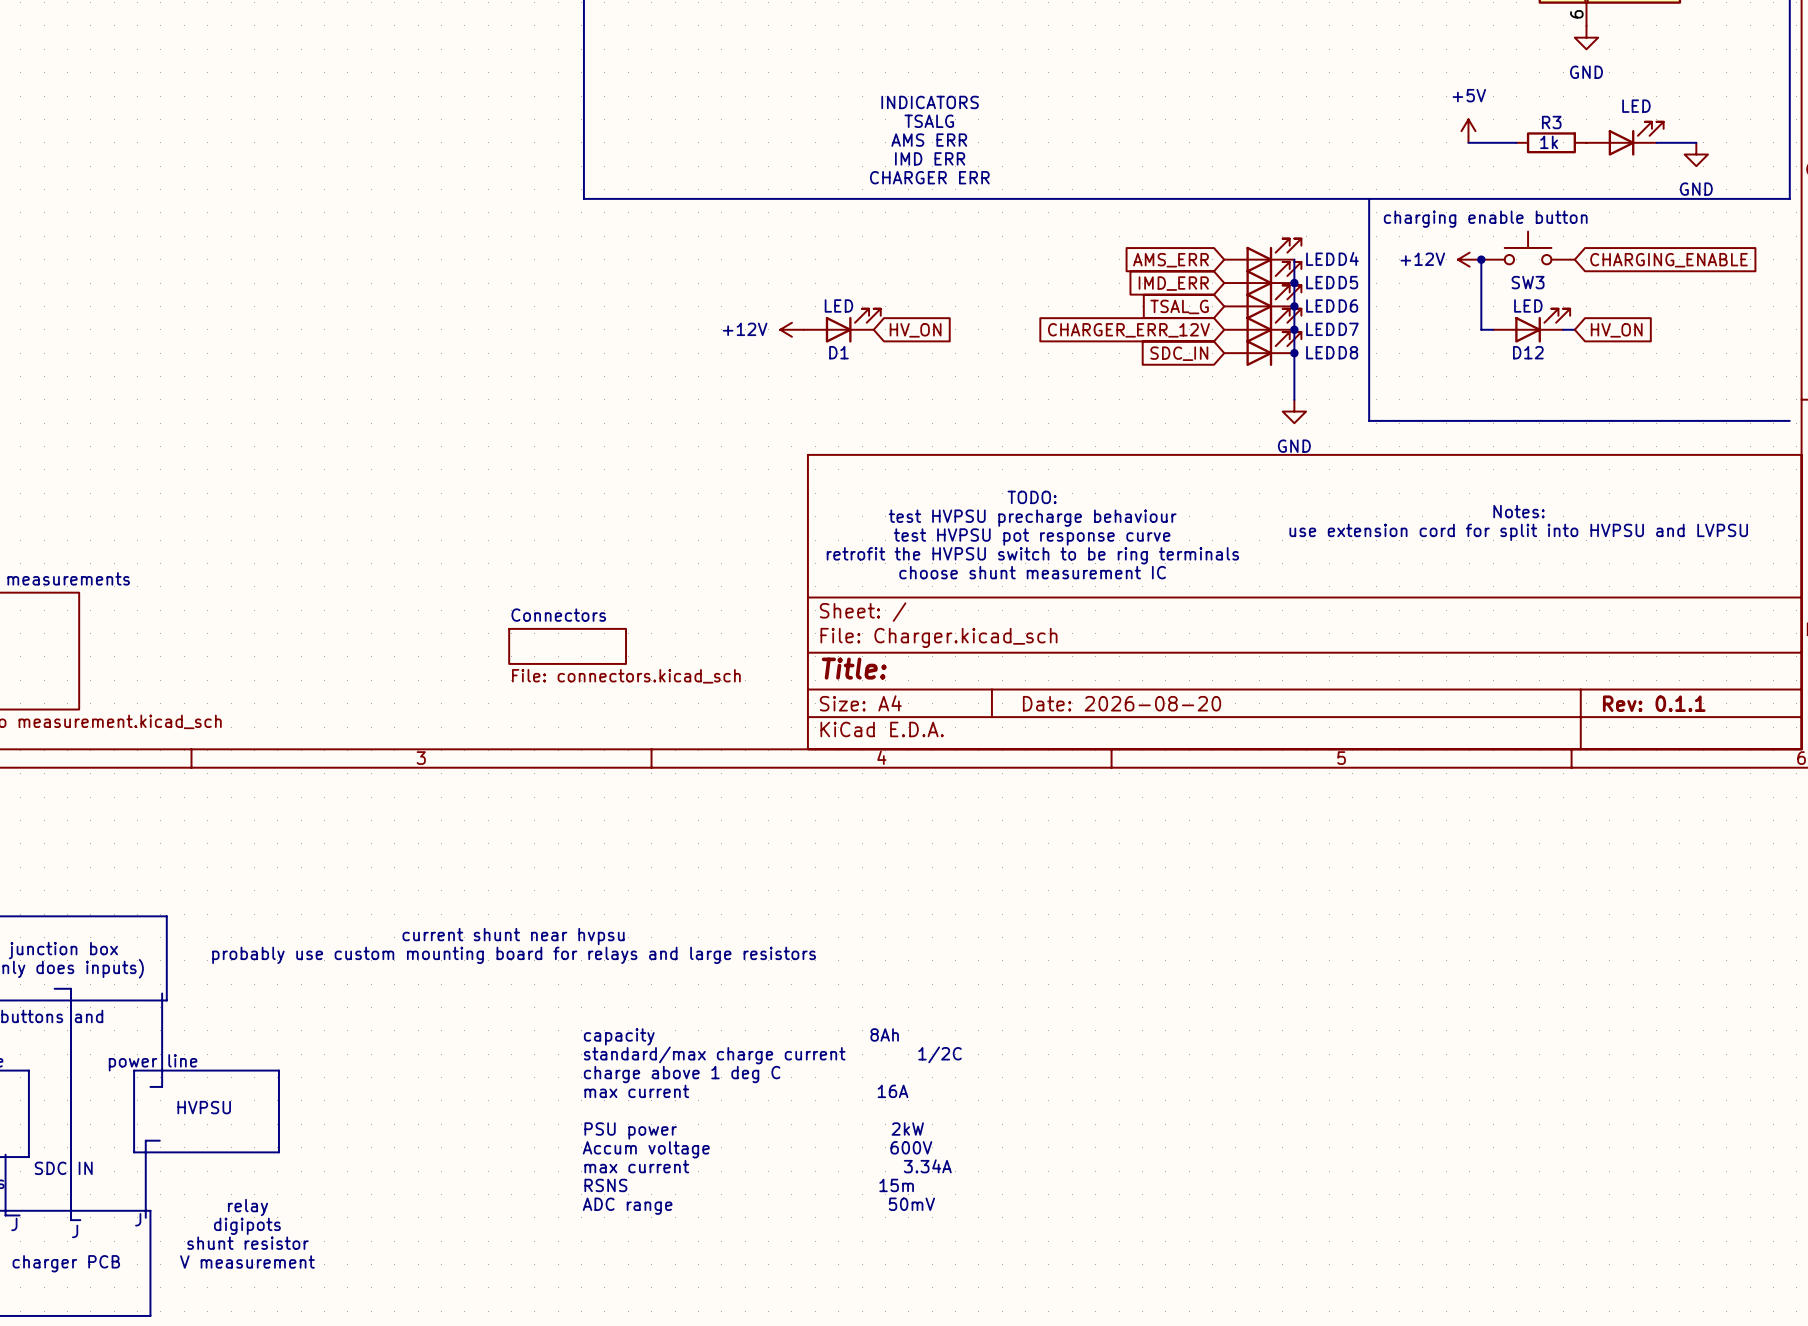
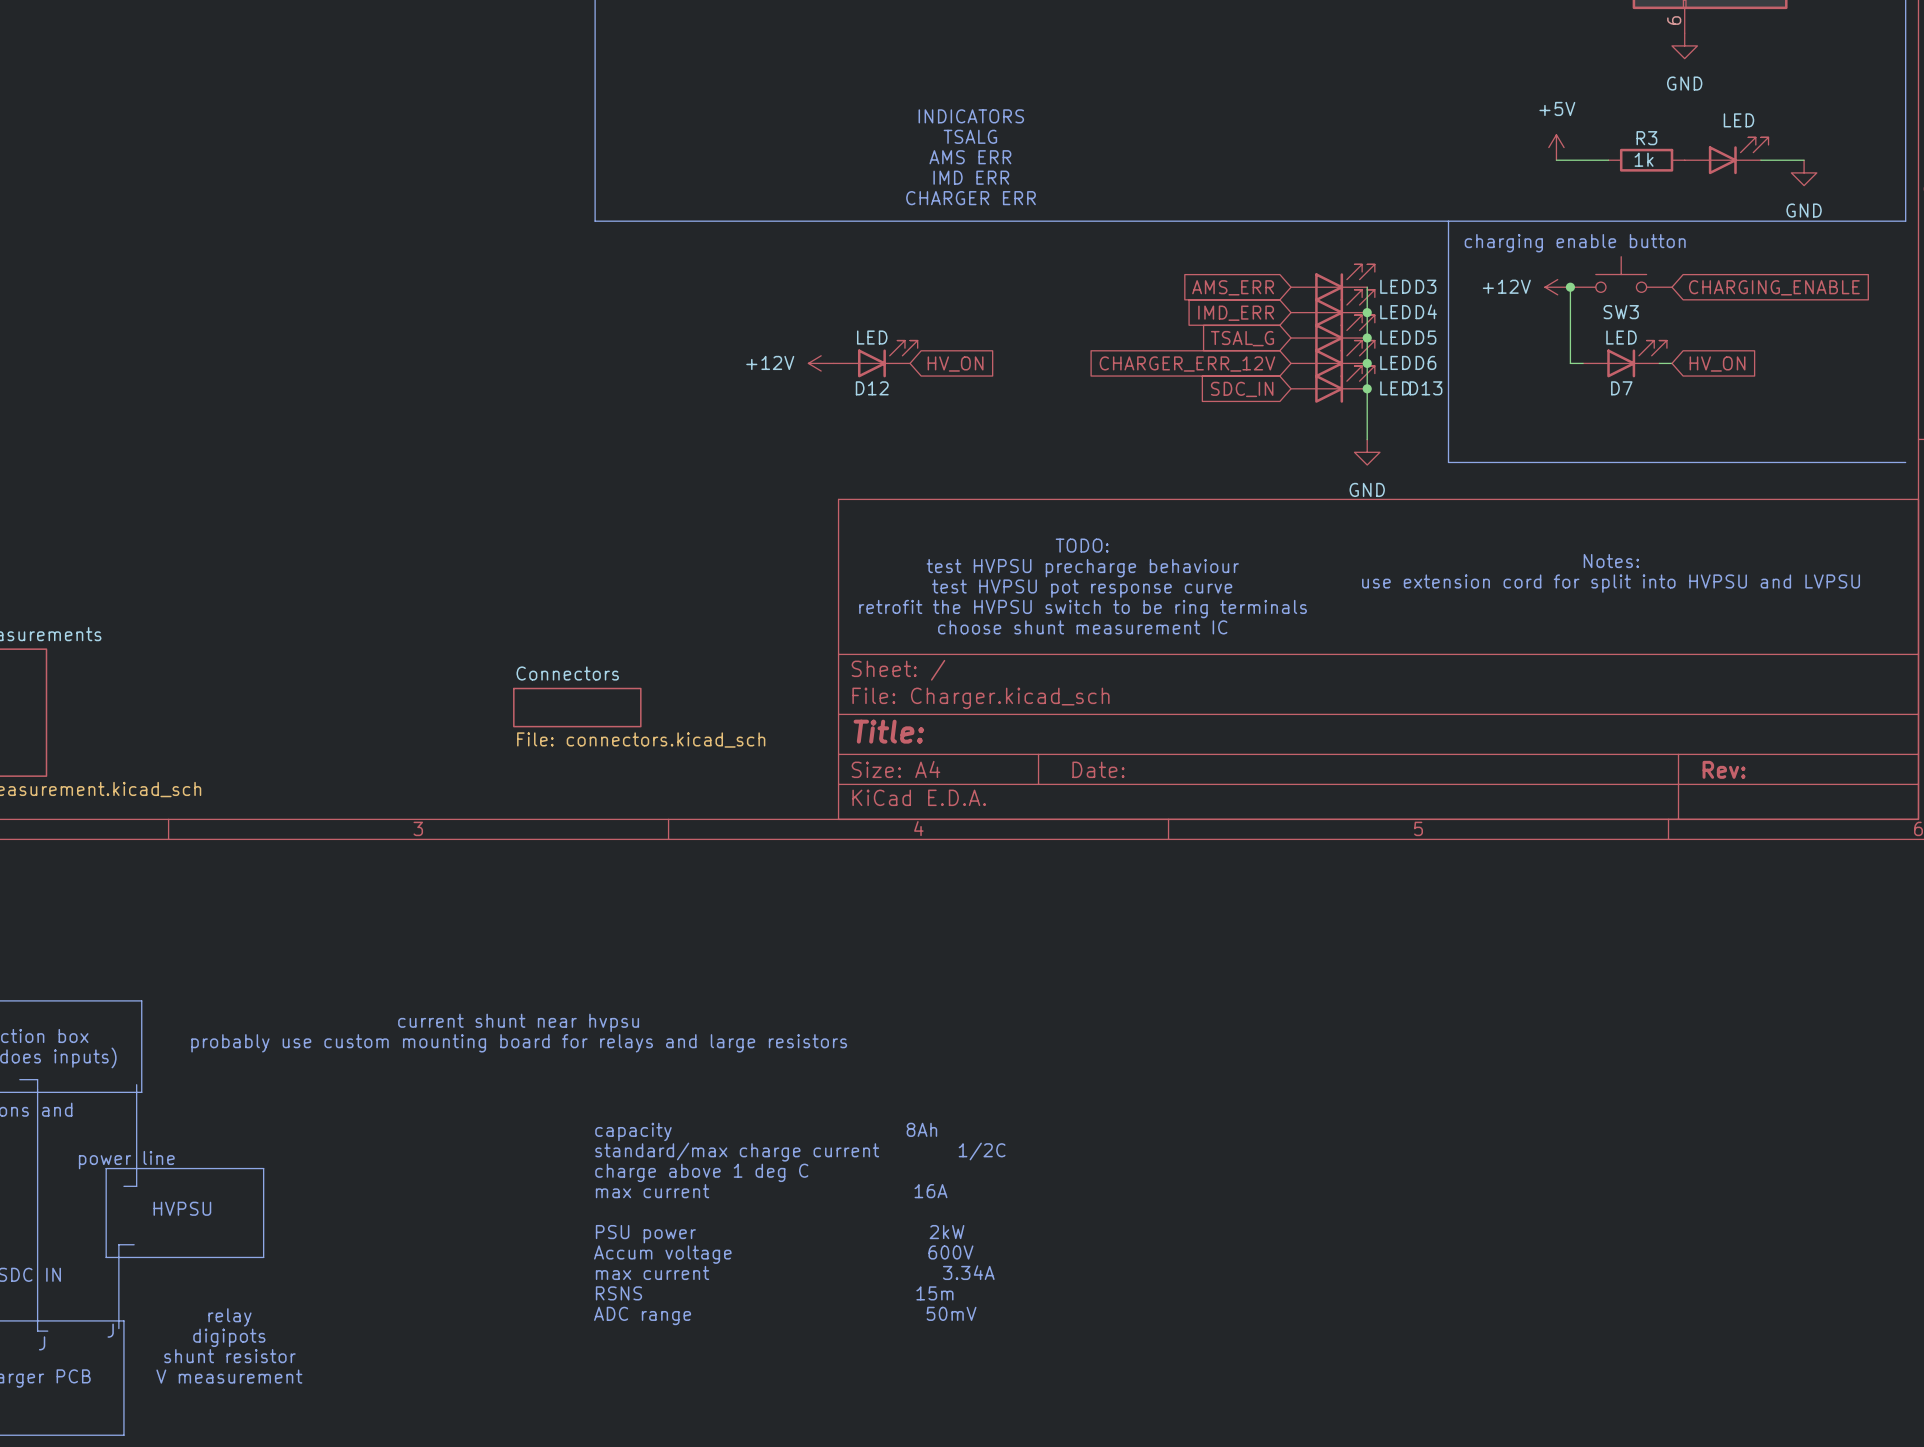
D4 name: D4 (1348, 258) -> D3 (1425, 286)
D5 name: D5 (1348, 282) -> D4 (1426, 311)
D6 name: D6 (1348, 305) -> D5 (1425, 337)
D7 name: D7 (1348, 329) -> D6 (1425, 362)
D1 name: D1 (838, 352) -> D12 (872, 388)
D8 name: D8 (1348, 352) -> D13 (1425, 388)
D12 name: D12 (1528, 352) -> D7 (1621, 388)
title block: Date: 2026-08-20 (1122, 703) -> Date: (1098, 769)
title block: Rev: 0.1.1 (1654, 703) -> Rev: (1724, 769)

